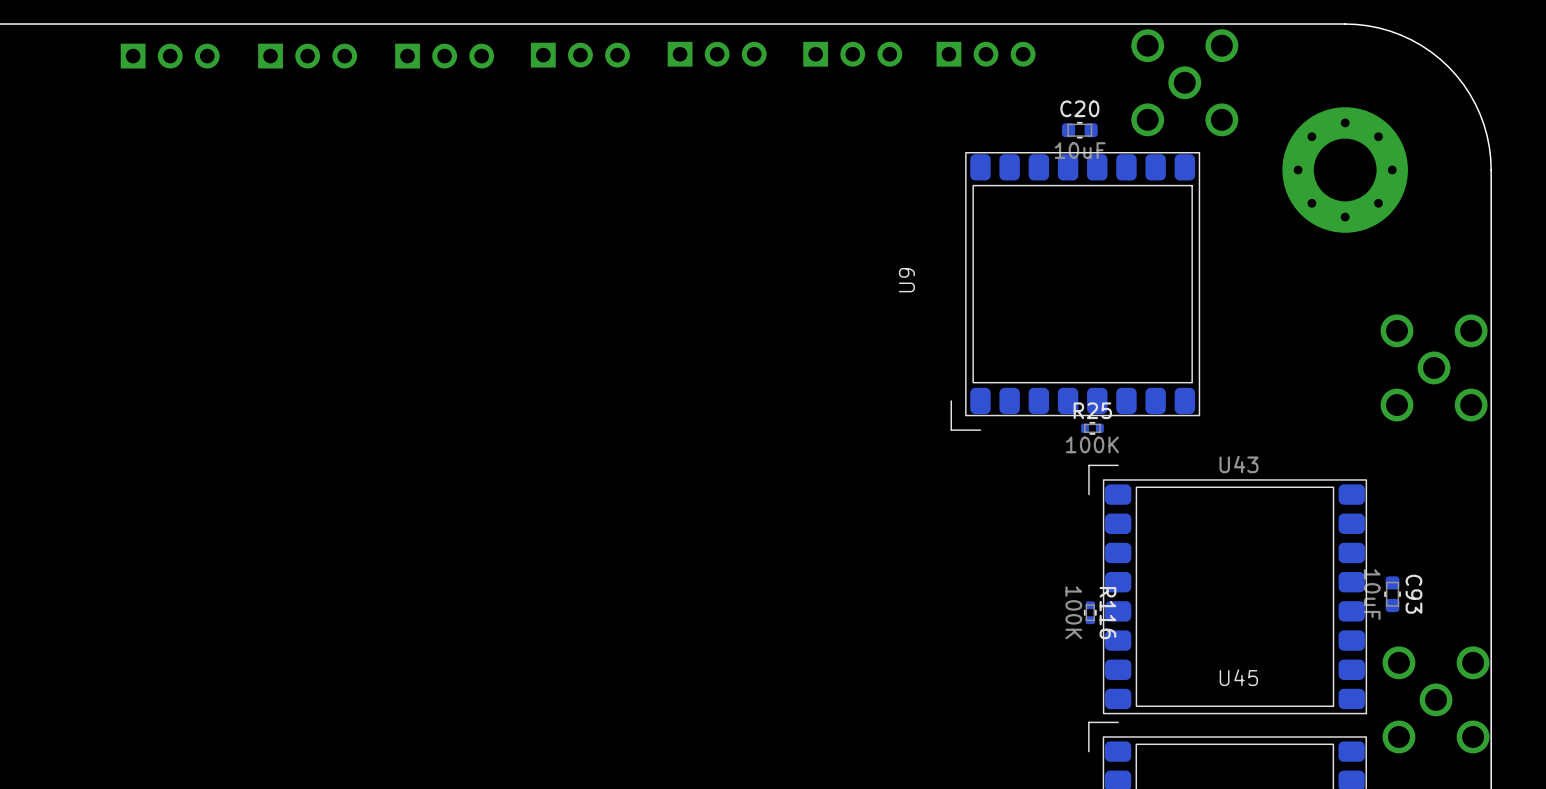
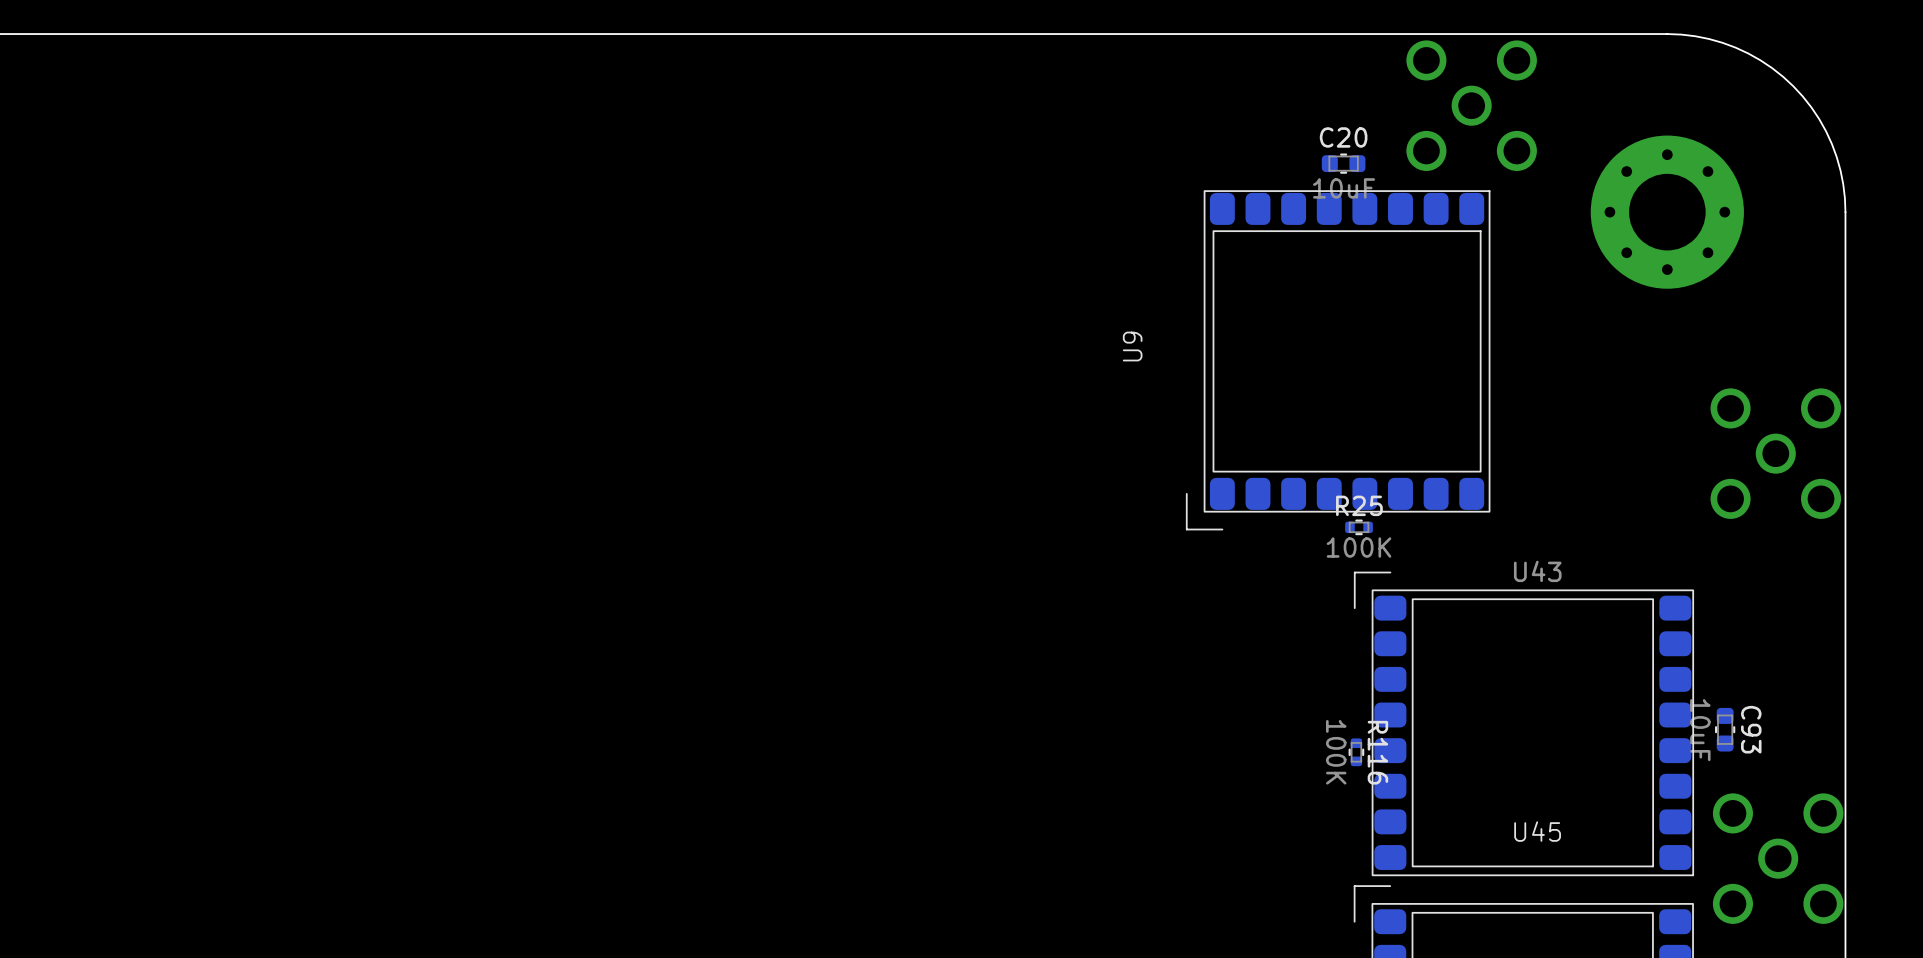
part: (717, 54) -> none
part: (852, 54) -> none
part: (986, 54) -> none
part: (580, 55) -> none
part: (170, 56) -> none
part: (307, 56) -> none
part: (444, 56) -> none

